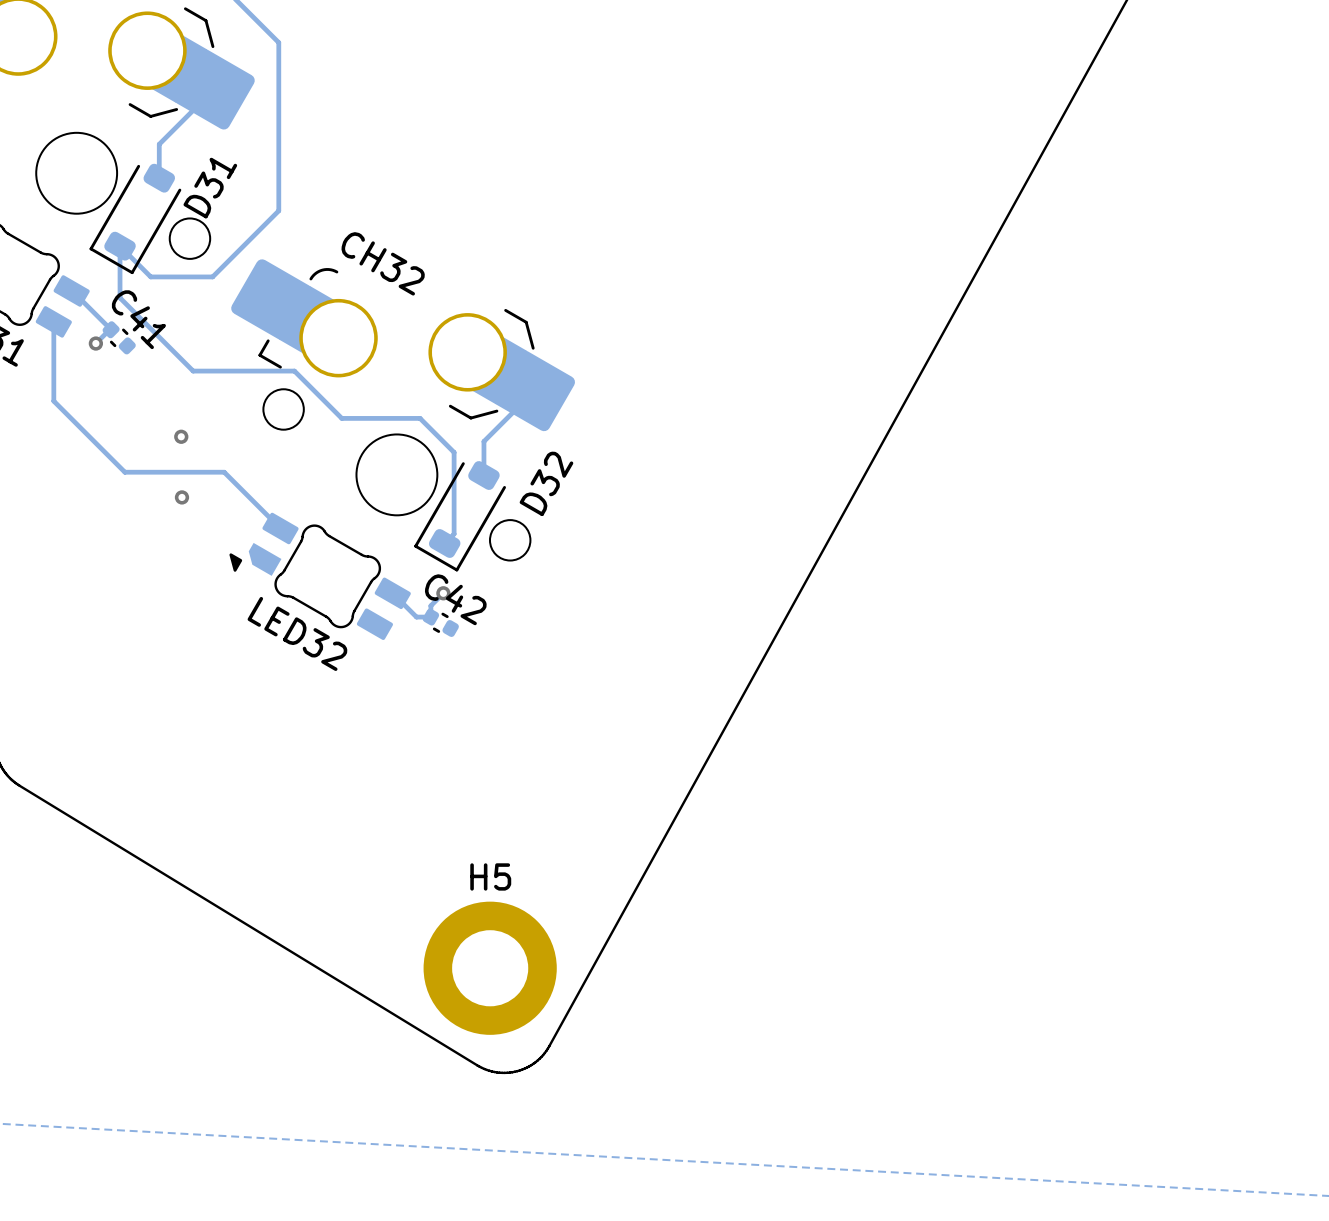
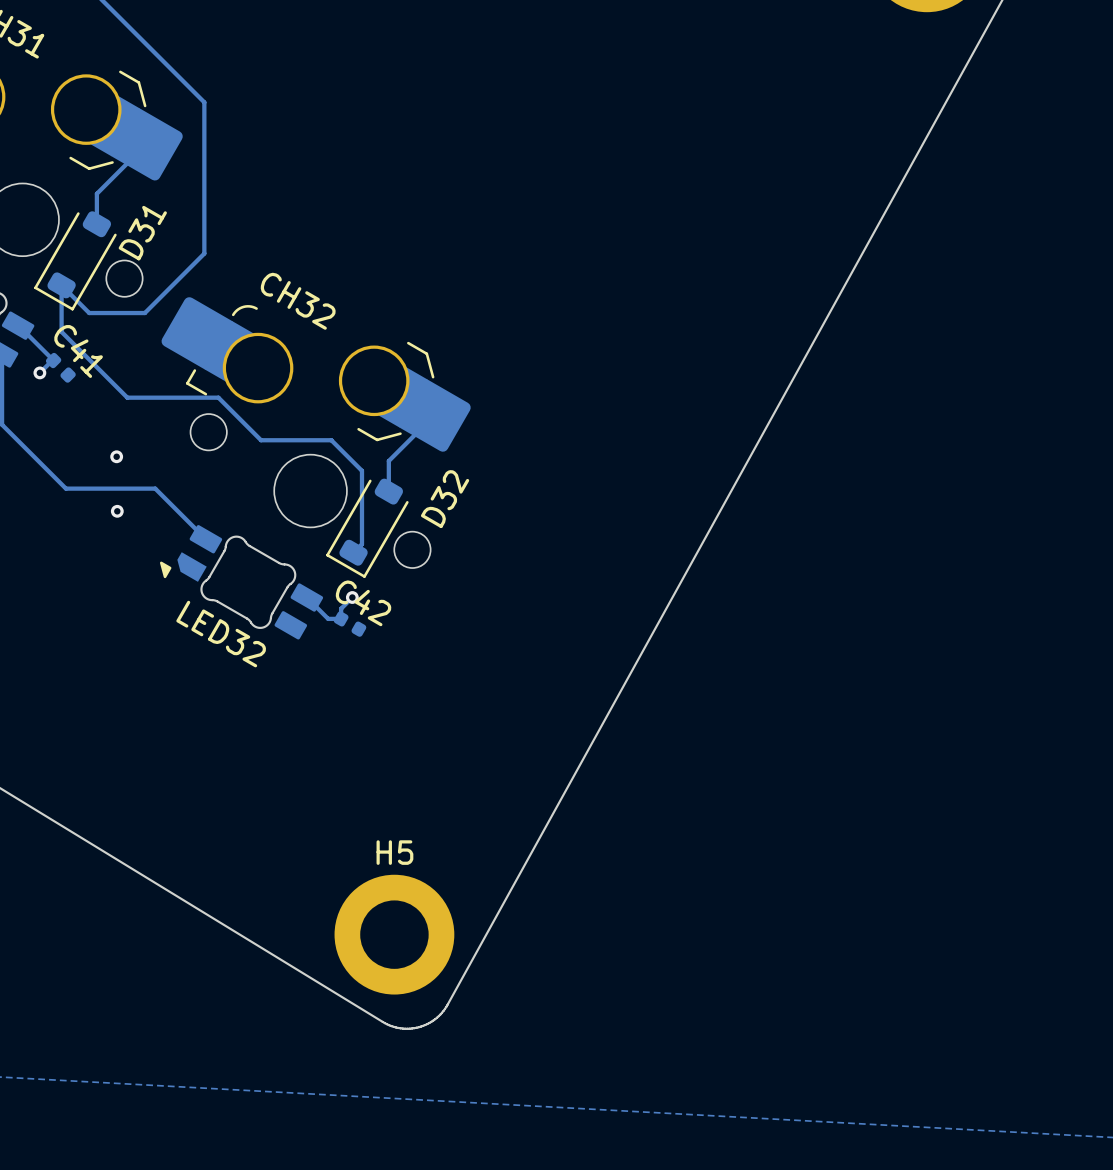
C41 footprint: [102, 321, 136, 355] -> [45, 352, 76, 383]
C42 footprint: [422, 608, 459, 637] -> [333, 611, 367, 637]

